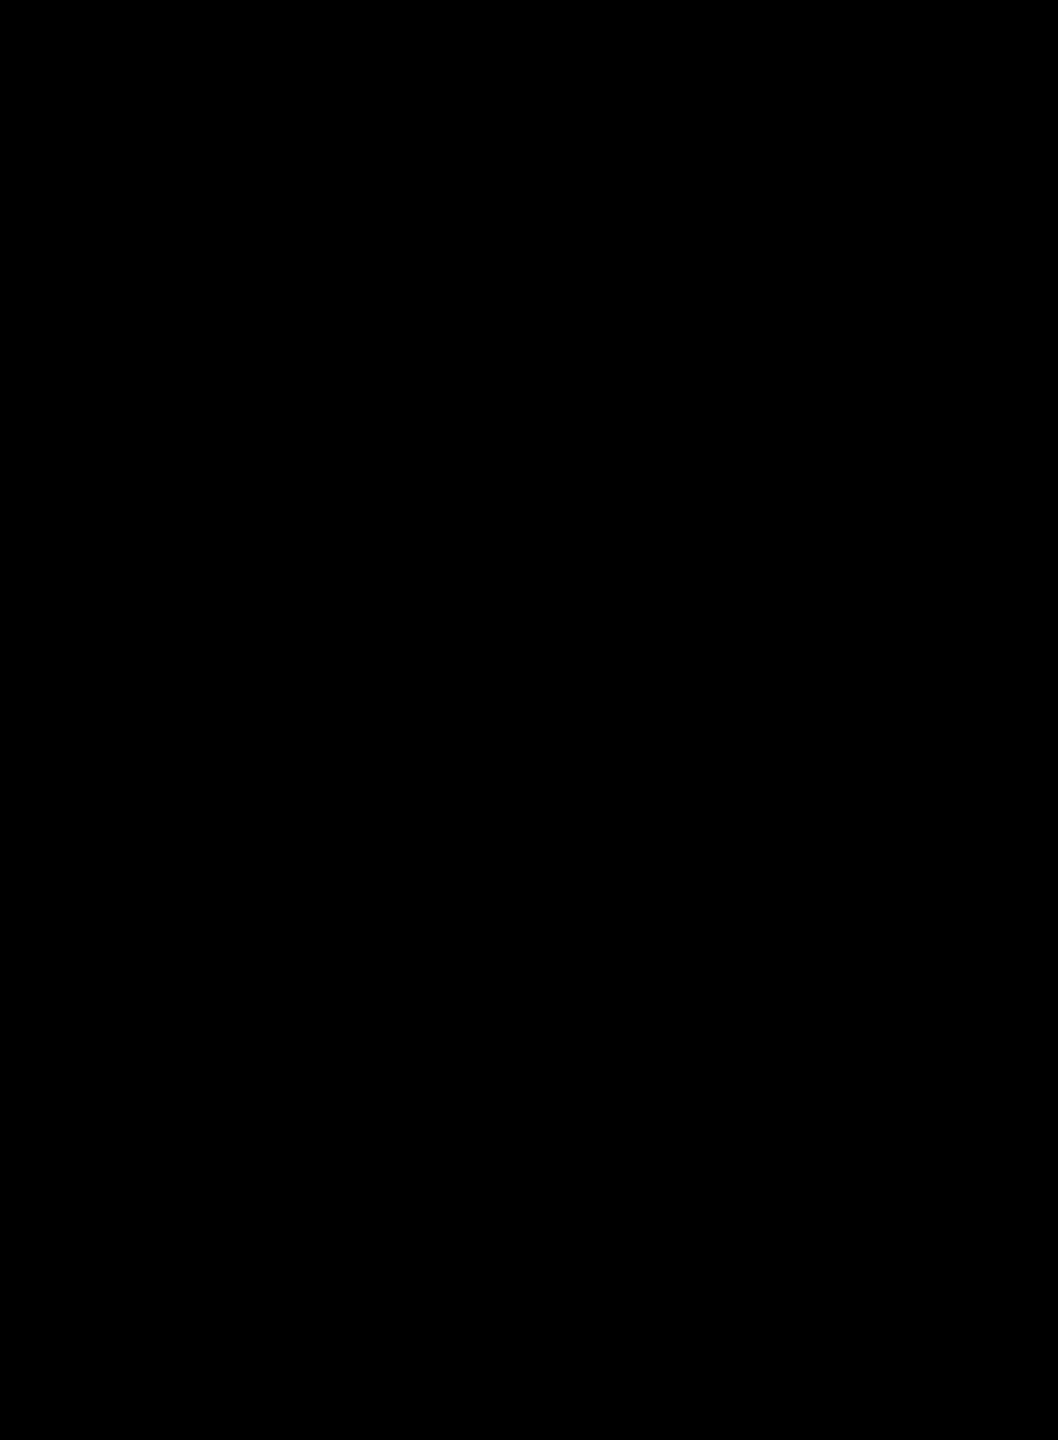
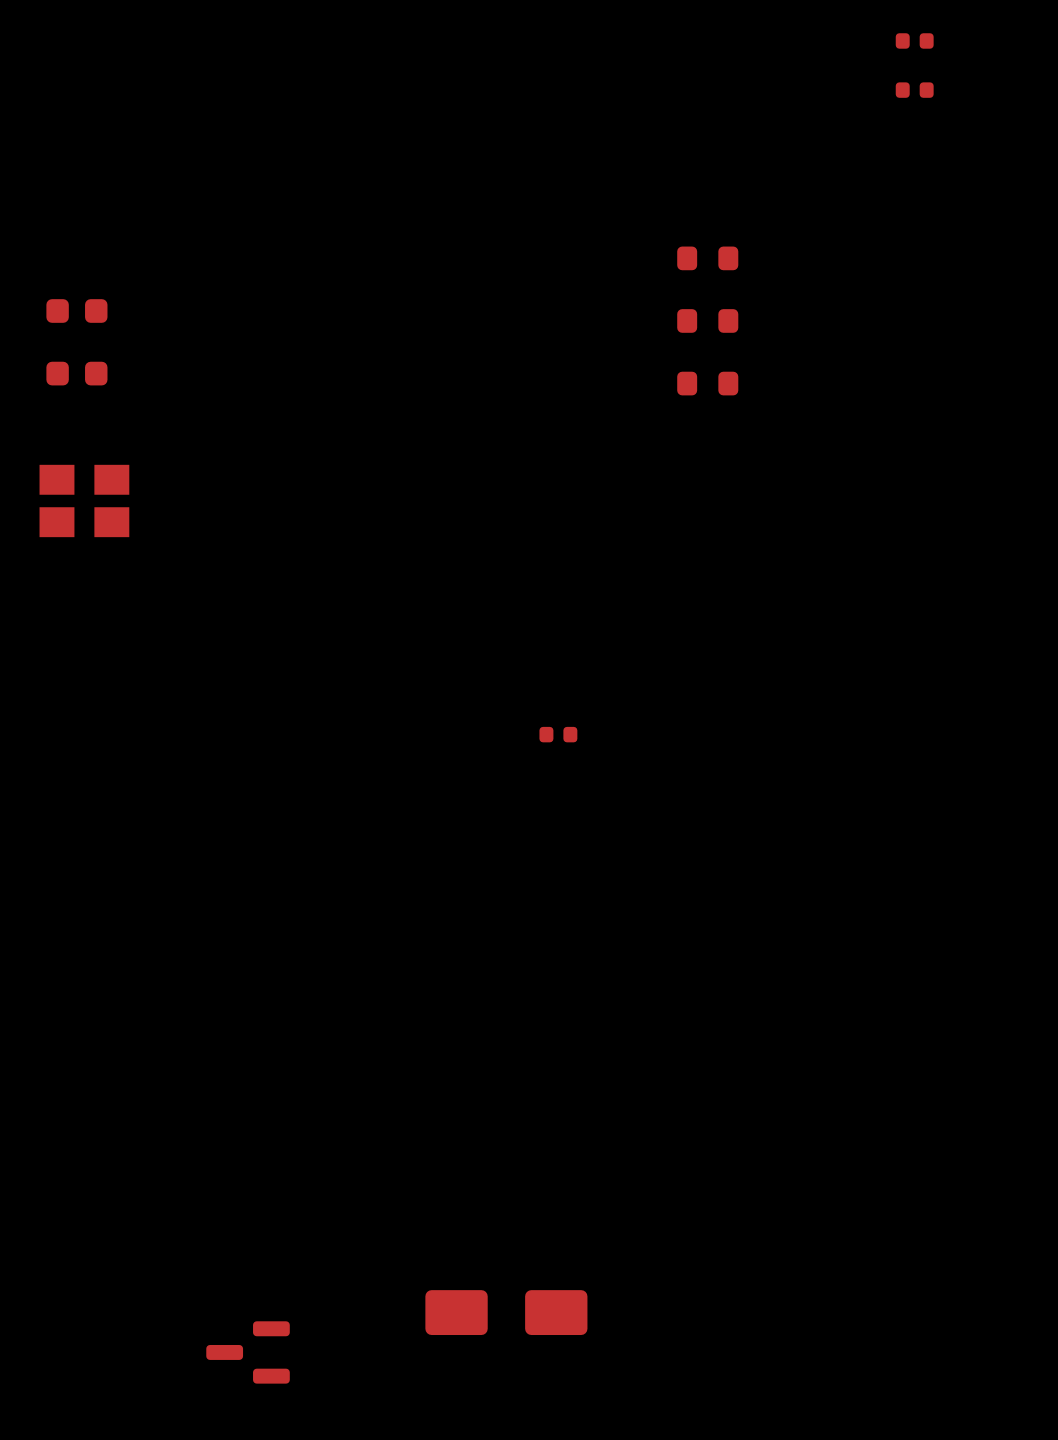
part: none -> (914, 40)
part: none -> (914, 90)
part: none -> (707, 258)
part: none -> (76, 311)
part: none -> (707, 320)
part: none -> (76, 373)
part: none -> (707, 383)
part: none -> (84, 500)
part: none -> (558, 734)
part: none -> (506, 1312)
part: none -> (248, 1352)

